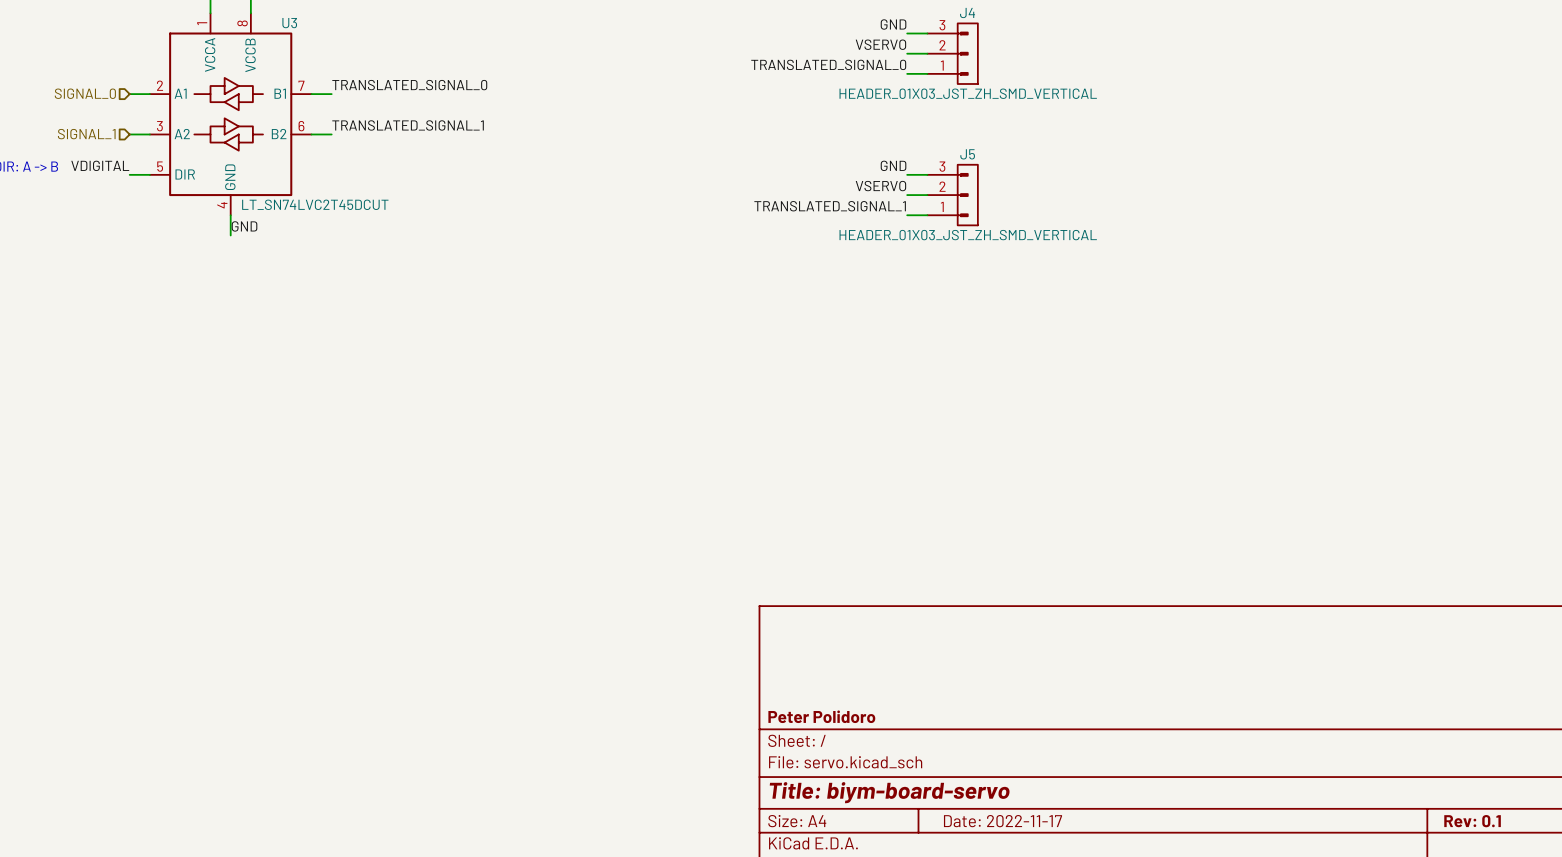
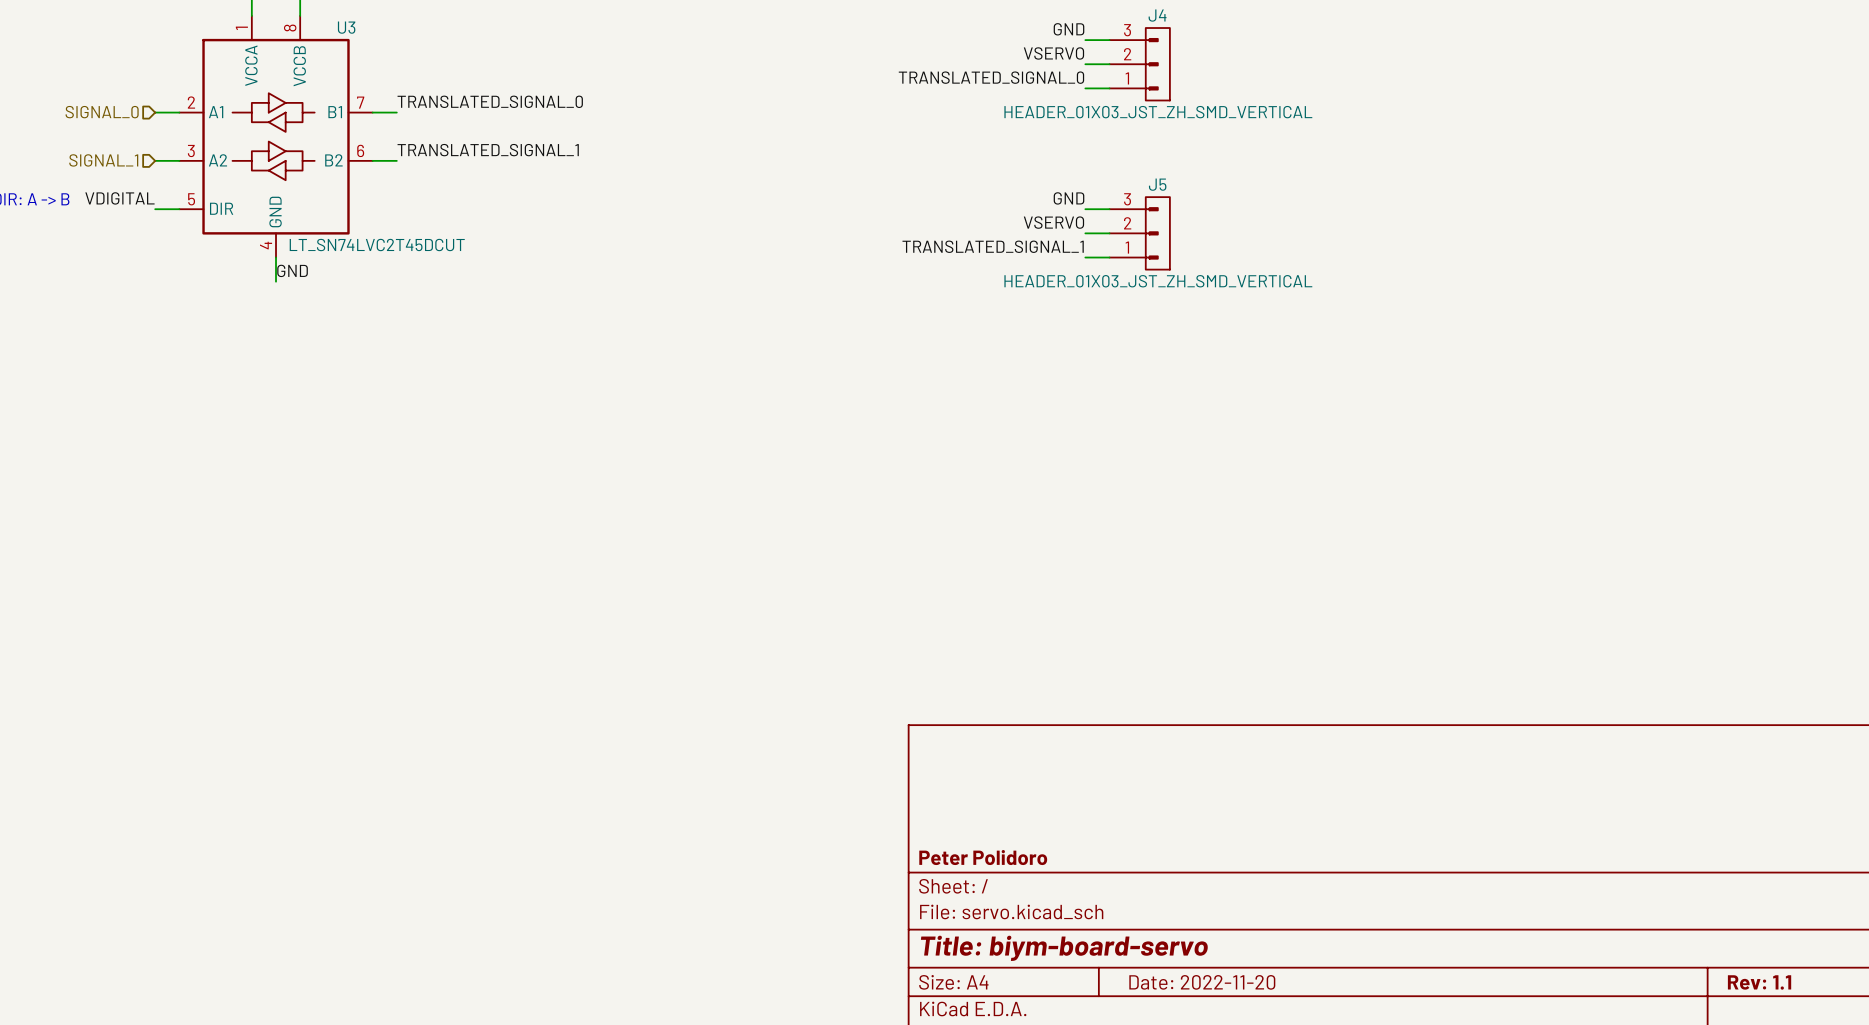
title block: Date: 2022-11-17 (1003, 821) -> Date: 2022-11-20 (1202, 982)
title block: Rev: 0.1 (1472, 821) -> Rev: 1.1 (1759, 982)

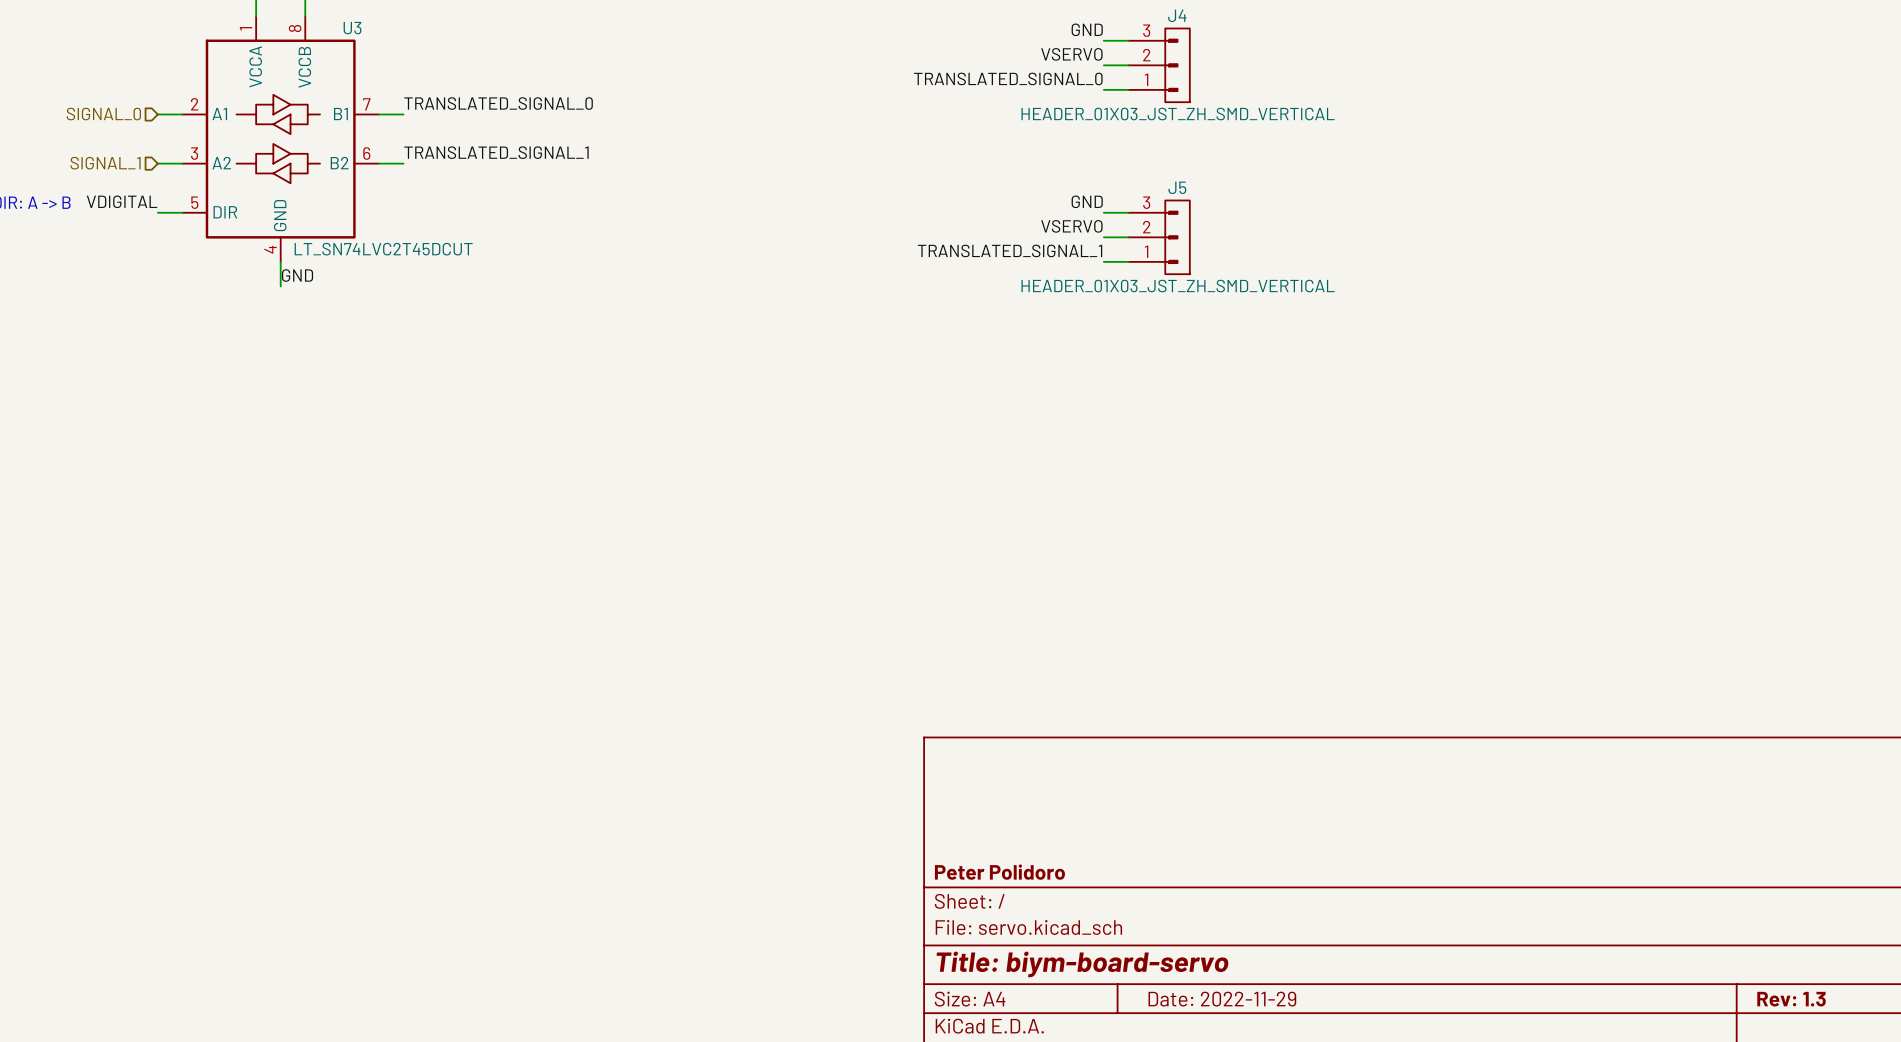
title block: Date: 2022-11-20 (1202, 982) -> Date: 2022-11-29 (1222, 999)
title block: Rev: 1.1 (1759, 982) -> Rev: 1.3 (1791, 999)

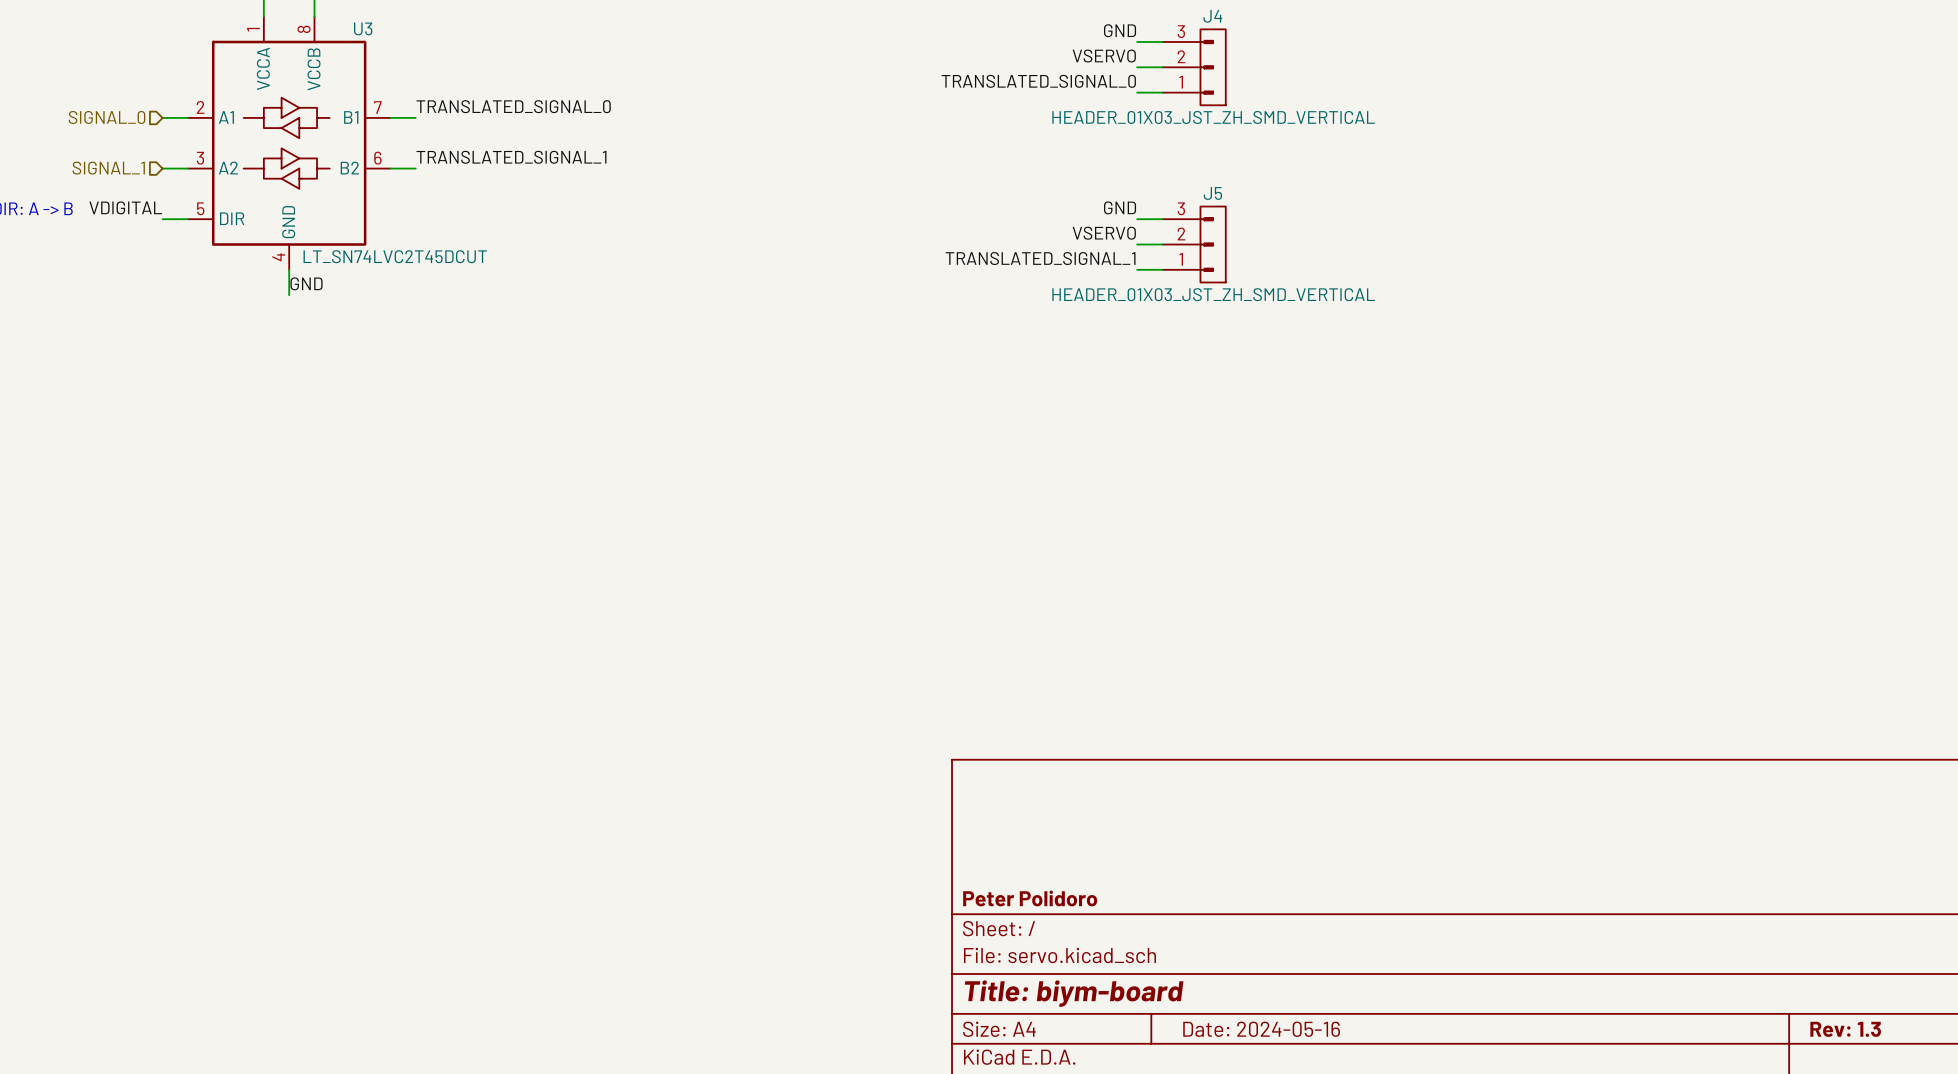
title block: Title: biym-board-servo (1082, 964) -> Title: biym-board (1074, 993)
title block: Date: 2022-11-29 (1222, 999) -> Date: 2024-05-16 (1261, 1029)

